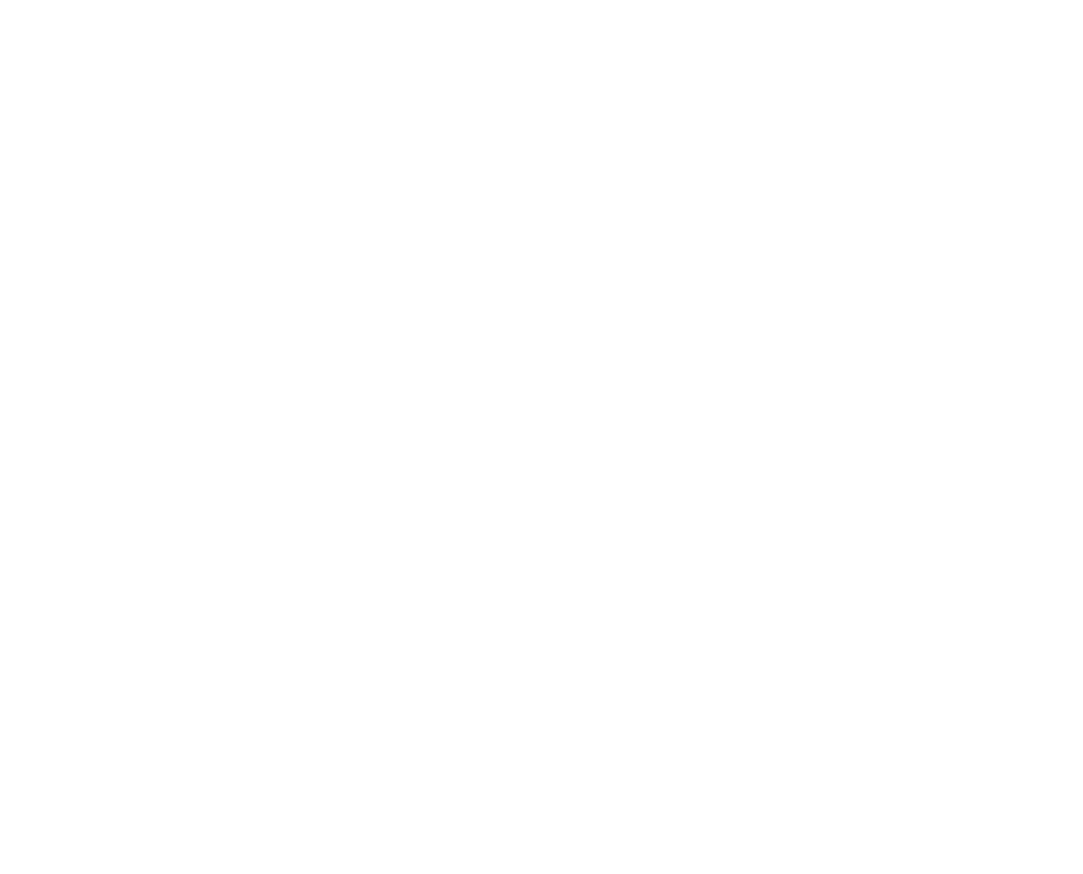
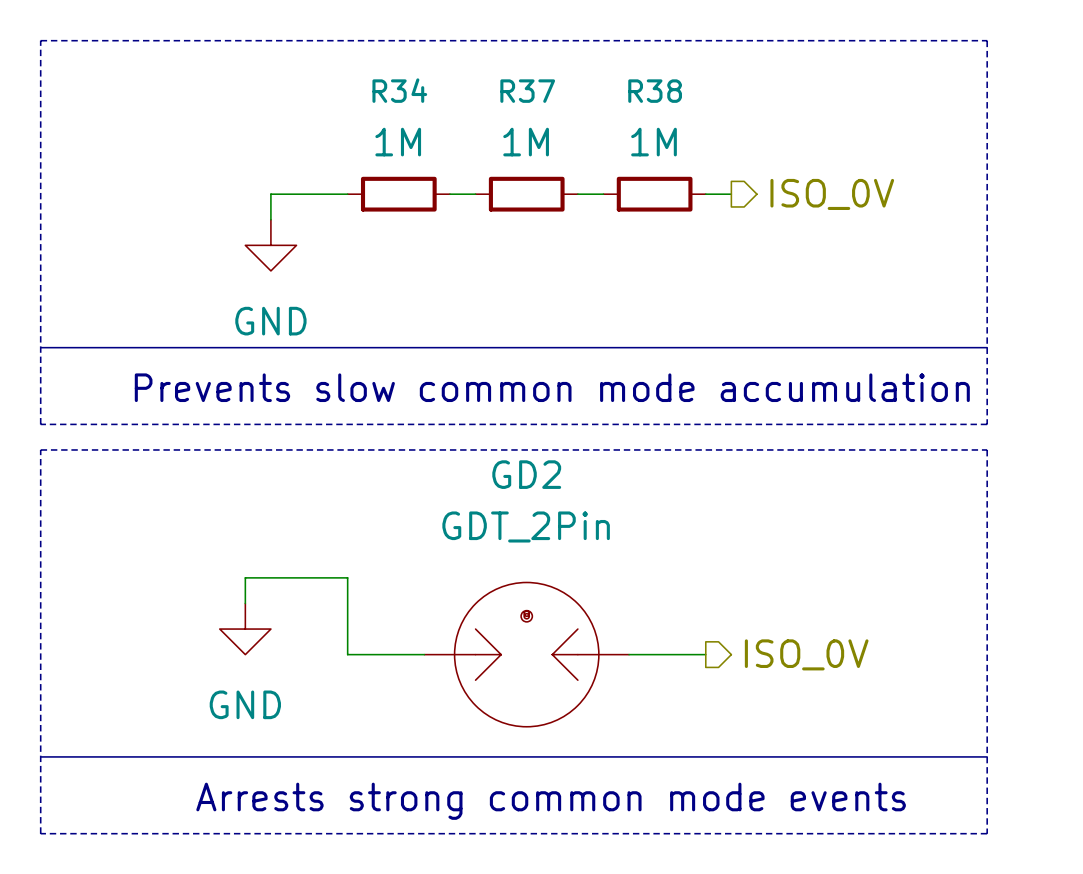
line: none -> (40, 40) (987, 40) (987, 424) (40, 424) (40, 40)
wire: none -> (347, 194) (270, 194) (270, 219)
R34: none -> 1M (398, 194)
wire: none -> (449, 194) (475, 194)
R37: none -> 1M (526, 194)
wire: none -> (577, 194) (603, 194)
R38: none -> 1M (654, 194)
wire: none -> (705, 194) (731, 194)
hierarchical label: none -> ISO_0V (832, 194)
power symbol: none -> GND (270, 245)
line: none -> (40, 347) (987, 347)
text: none -> Prevents slow common mode accumulation (552, 387)
line: none -> (40, 449) (40, 833) (987, 833) (987, 449) (40, 449)
wire: none -> (245, 603) (245, 577) (347, 577) (347, 654) (424, 654)
power symbol: none -> GND (245, 629)
GD2: none -> GDT_2Pin (526, 654)
wire: none -> (629, 654) (705, 654)
hierarchical label: none -> ISO_0V (806, 654)
line: none -> (40, 756) (987, 756)
text: none -> Arrests strong common mode events (551, 801)

